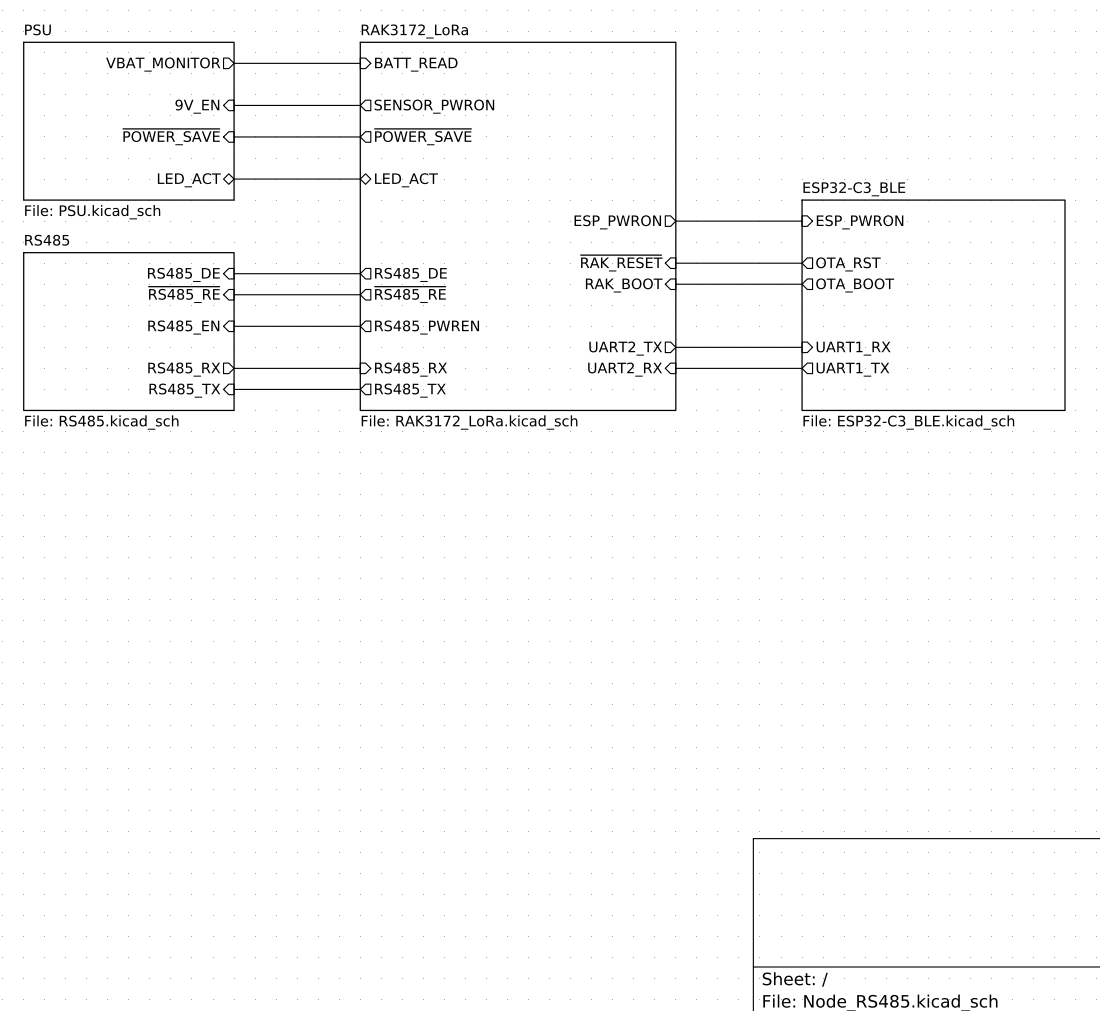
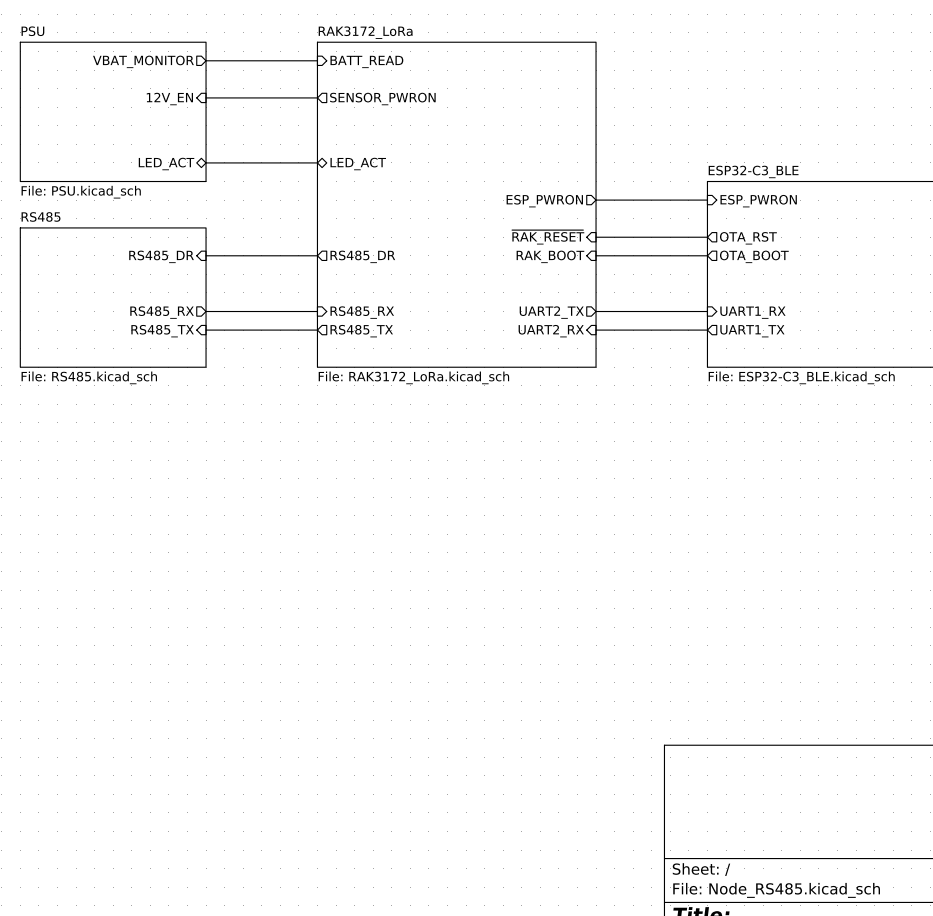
sheet pin: 9V_EN (197, 106) -> 12V_EN (169, 99)
wire: (234, 136) (360, 136) -> none
sheet pin: ~{POWER_SAVE} (171, 137) -> none
sheet pin: ~{POWER_SAVE} (423, 137) -> none
wire: (234, 273) (360, 273) -> none
sheet pin: RS485_DE (183, 274) -> none
sheet pin: RS485_DE (410, 274) -> none
sheet pin: none -> RS485_DR (161, 256)
sheet pin: none -> RS485_DR (362, 256)
sheet pin: ~{RS485_RE} (184, 294) -> none
wire: (234, 294) (360, 294) -> none
sheet pin: ~{RS485_RE} (410, 294) -> none
wire: (234, 326) (360, 326) -> (206, 255) (317, 255)
sheet pin shape: input (183, 327) -> output (162, 312)
sheet pin: RS485_EN (183, 327) -> RS485_RX (162, 312)
sheet pin shape: output (427, 327) -> input (362, 312)
sheet pin: RS485_PWREN (427, 327) -> RS485_RX (362, 312)
sheet pin shape: output (184, 369) -> input (162, 331)
sheet pin: RS485_RX (184, 369) -> RS485_TX (162, 331)
sheet pin shape: input (411, 369) -> output (361, 331)
sheet pin: RS485_RX (411, 369) -> RS485_TX (361, 331)
wire: (234, 389) (360, 389) -> (206, 311) (317, 311)
sheet pin: RS485_TX (184, 390) -> none
sheet pin: RS485_TX (410, 390) -> none

